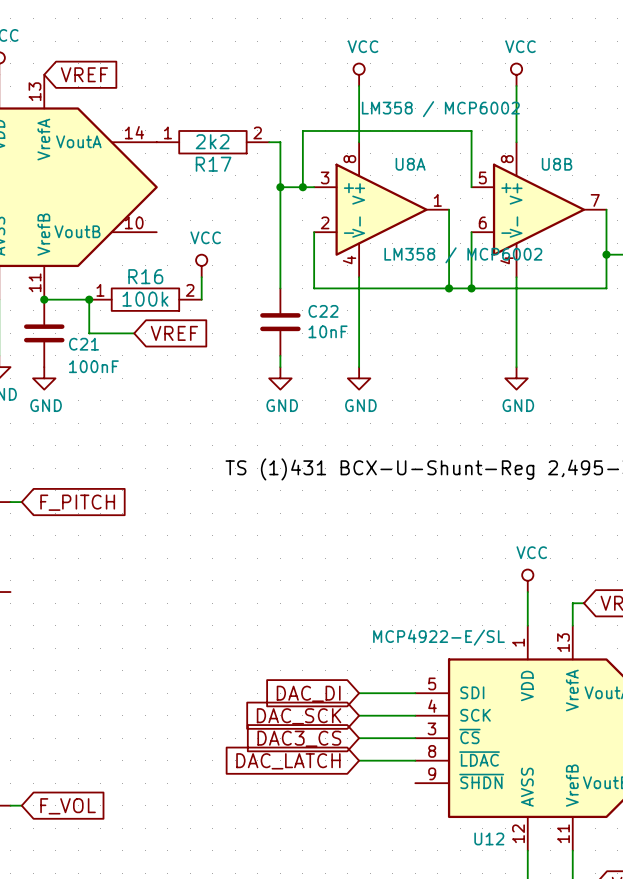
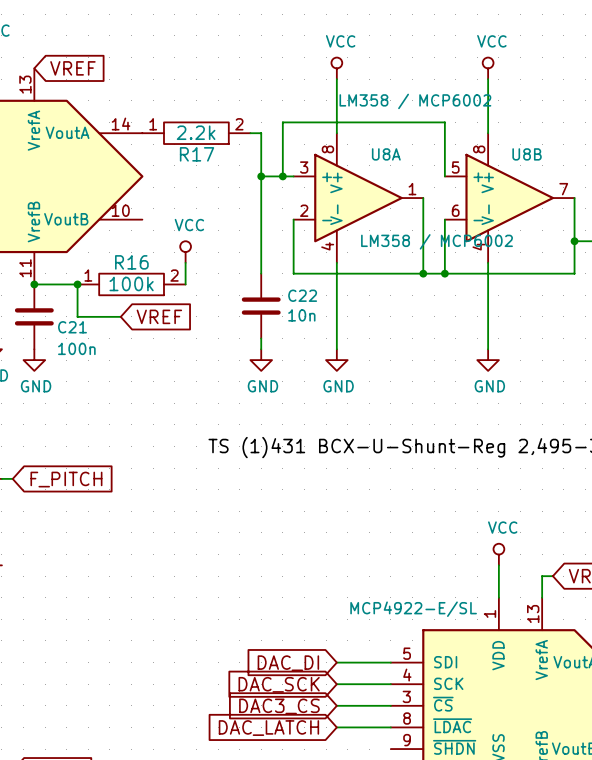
R17 value: 2k2 (212, 141) -> 2.2k (196, 132)
C22 value: 10nF (328, 331) -> 10n (301, 315)
C21 value: 100nF (93, 366) -> 100n (76, 348)

